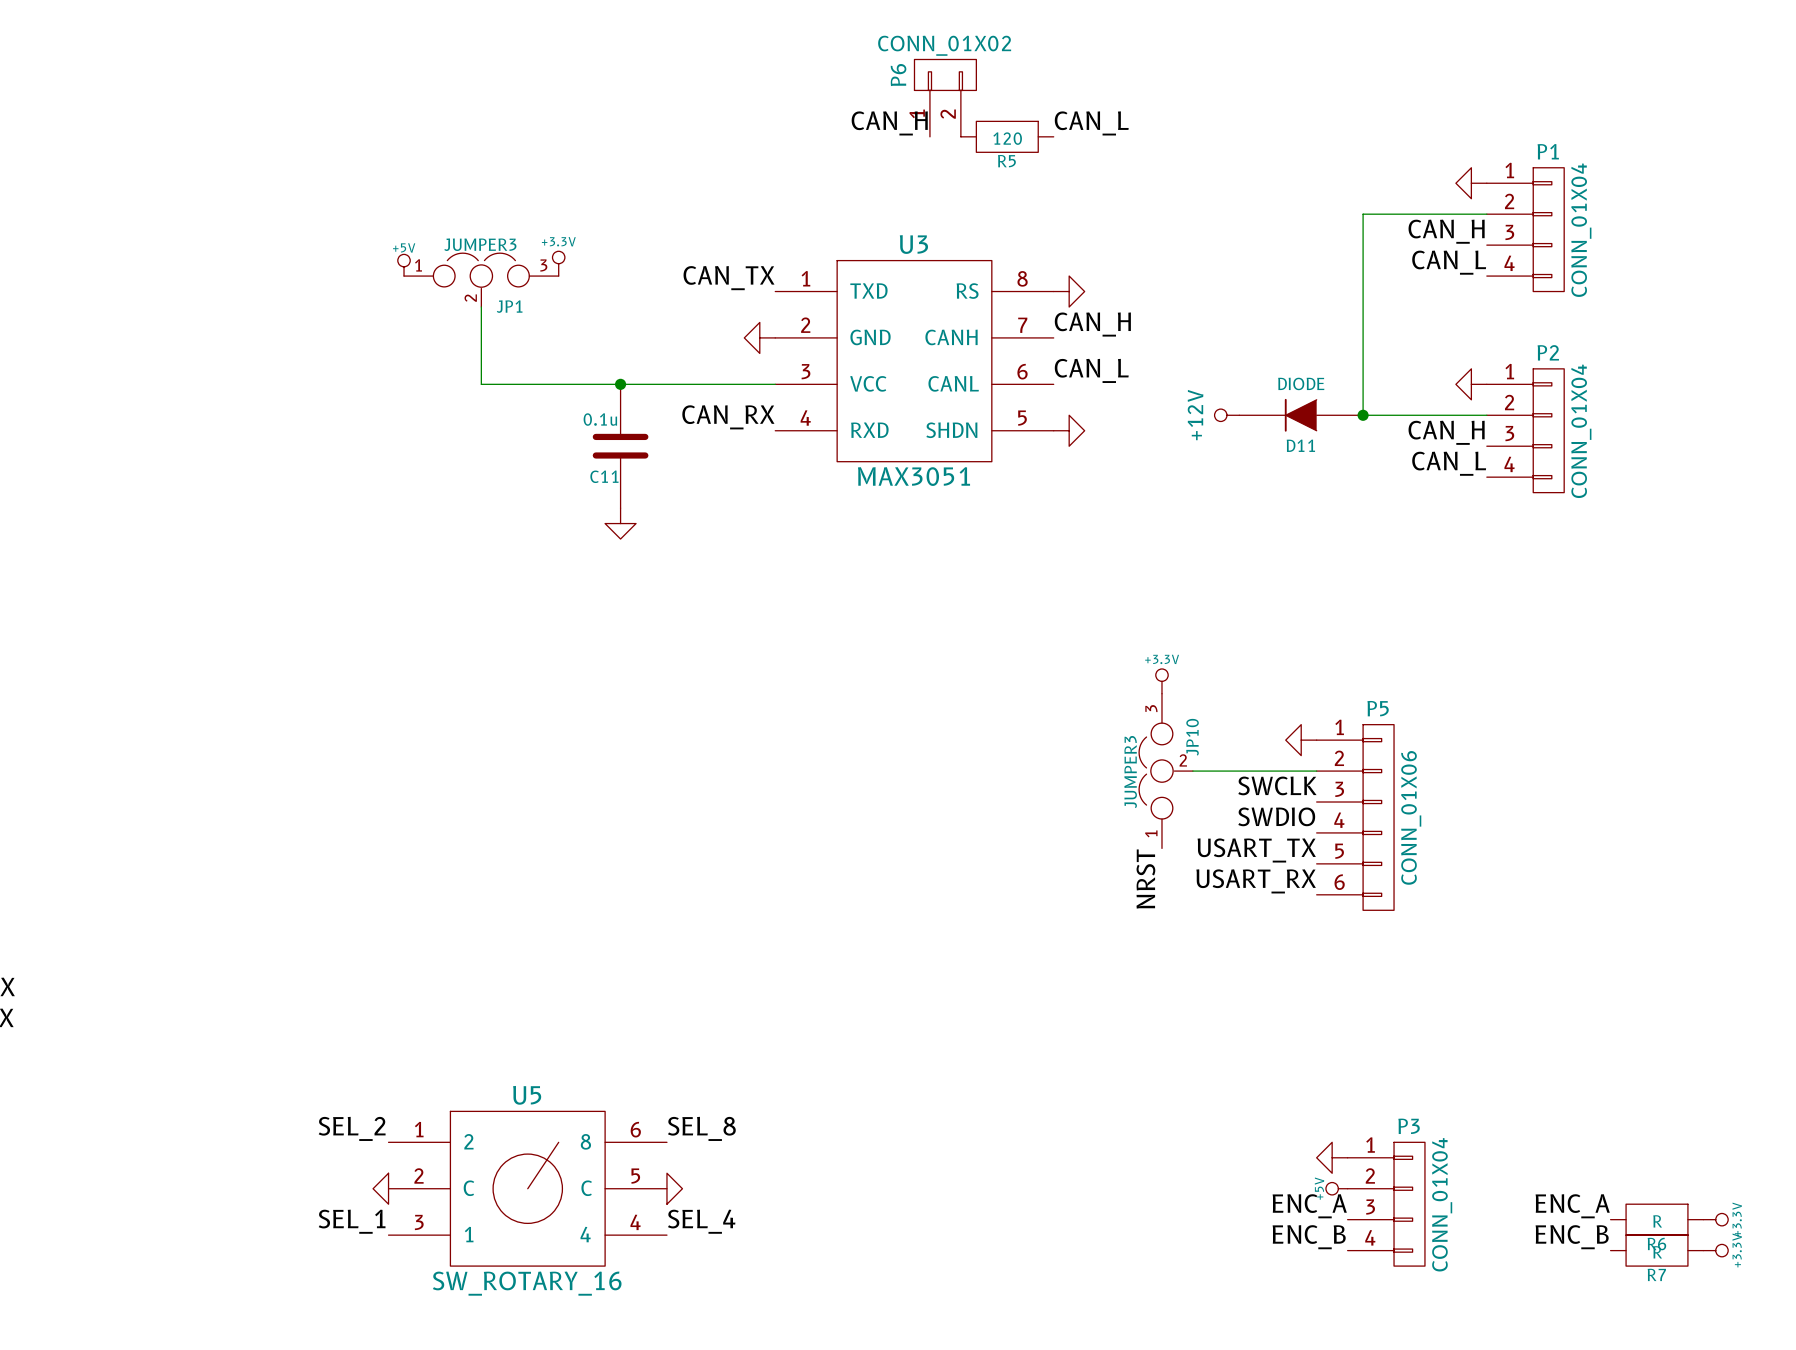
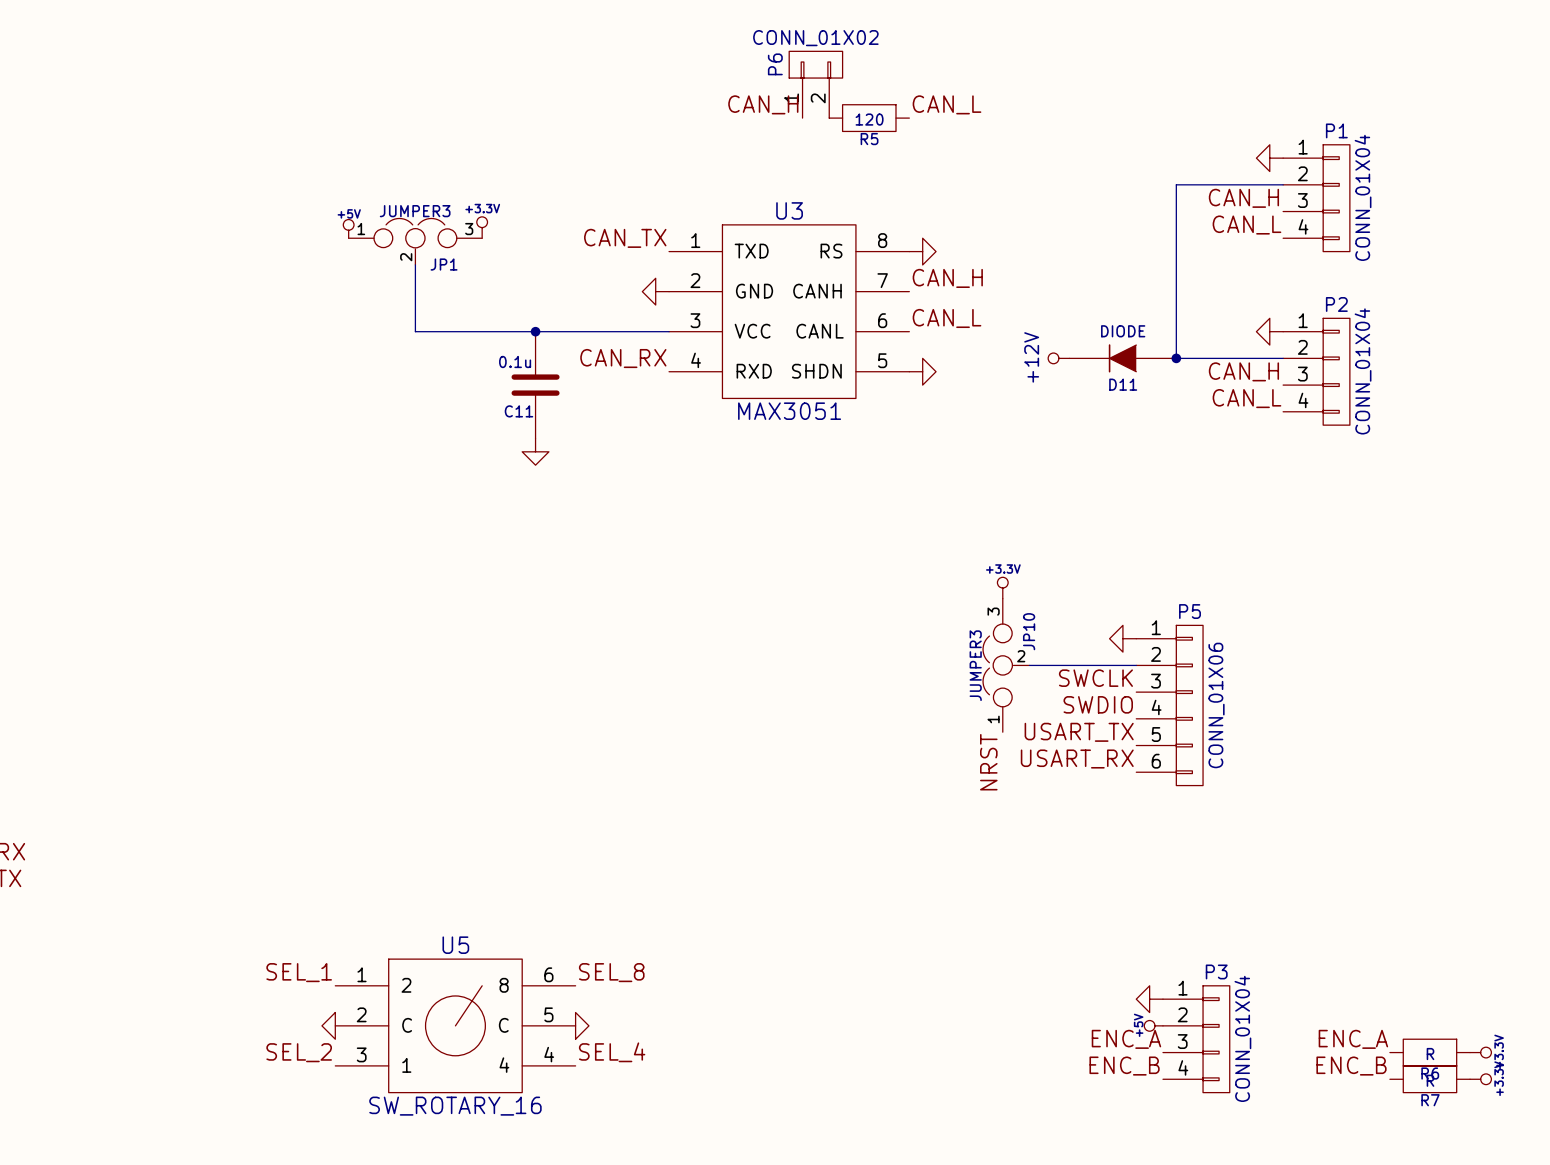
label: SEL_2 (352, 1128) -> SEL_1 (299, 972)
label: SEL_1 (352, 1221) -> SEL_2 (299, 1052)

